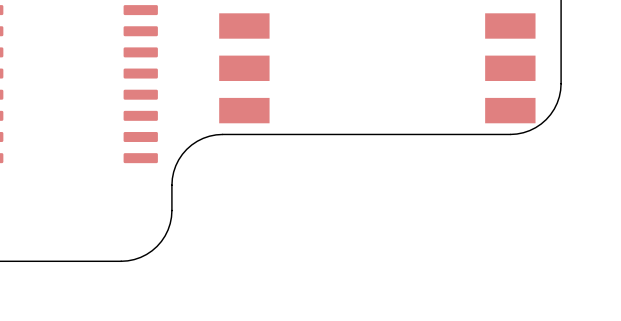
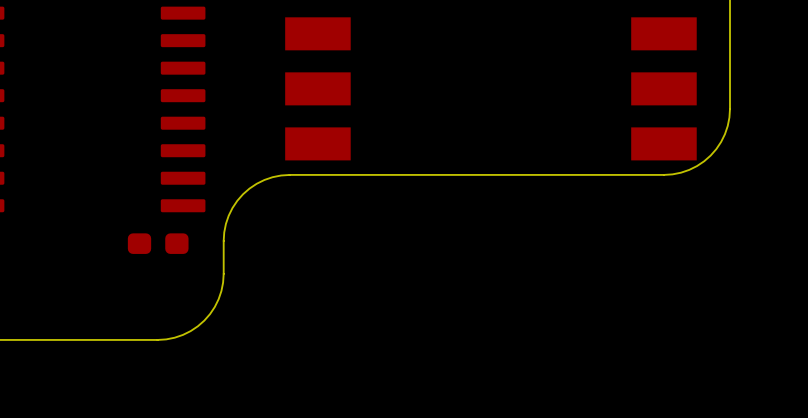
part: none -> (158, 243)

